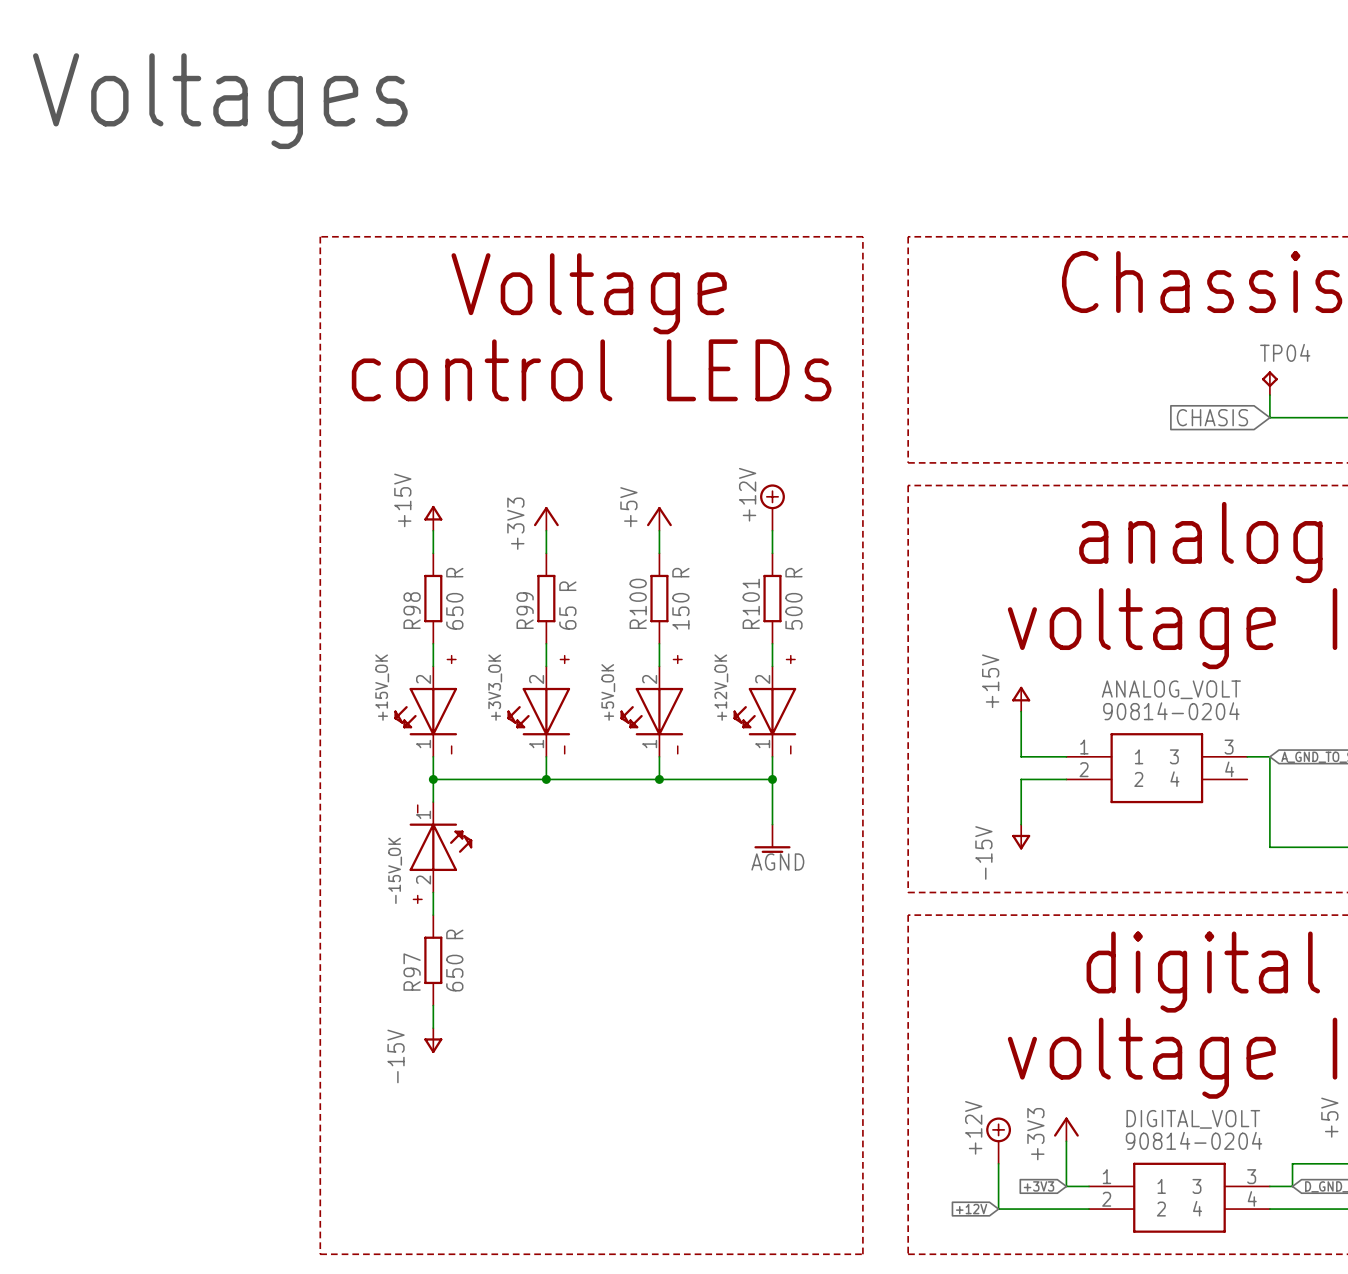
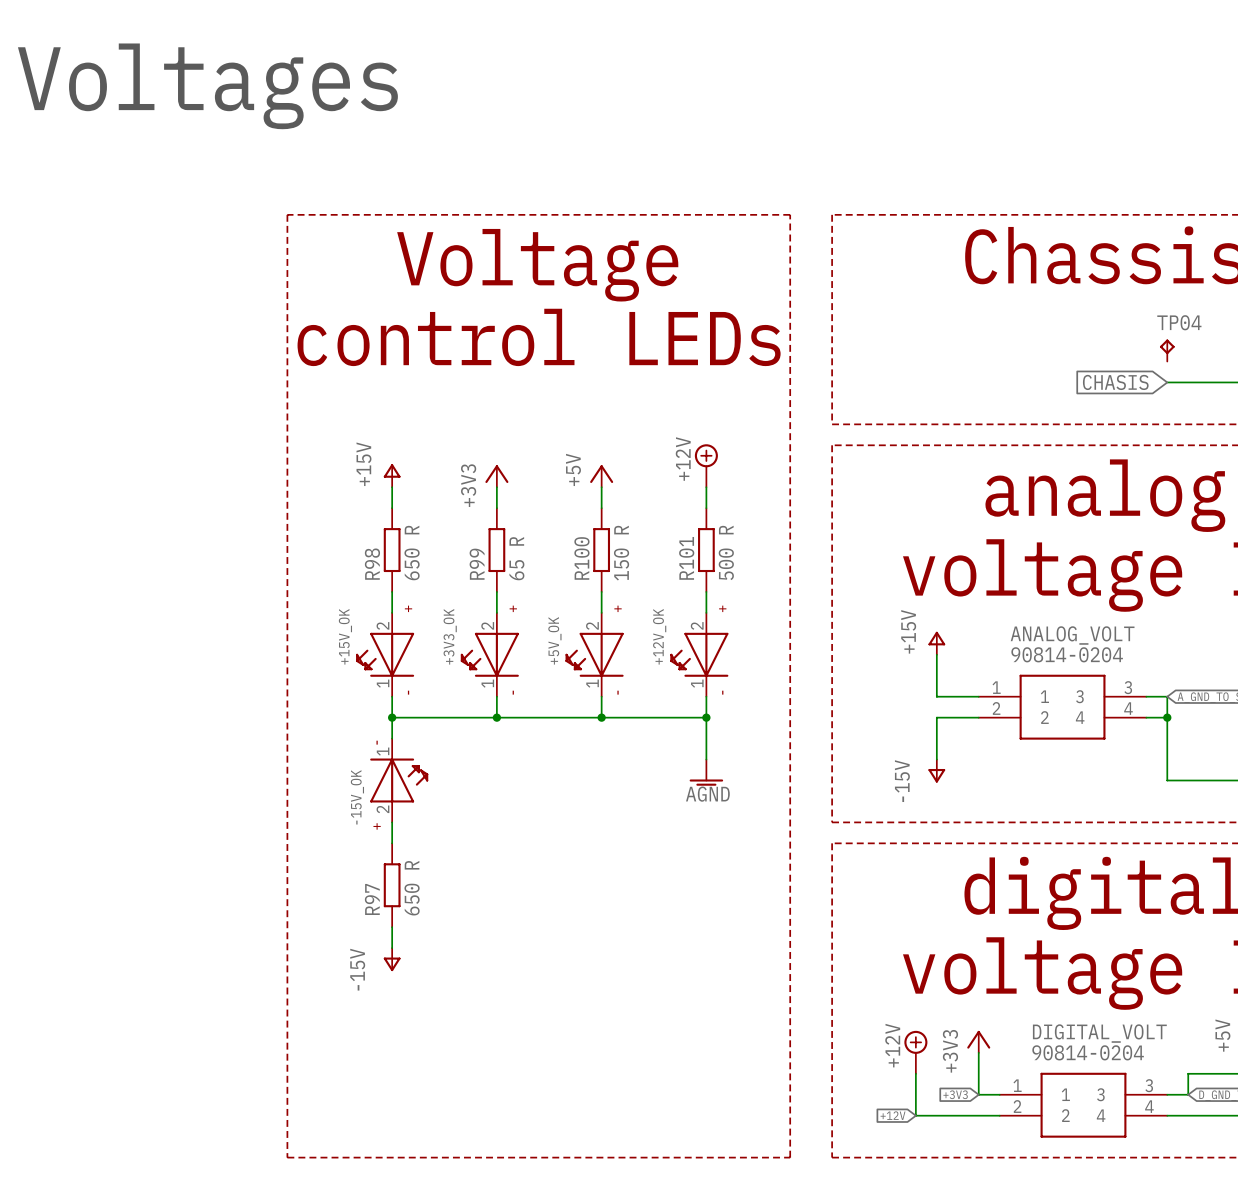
wire: (1269, 395) (1269, 417) -> none
wire: none -> (1146, 717) (1167, 717)
junction: none -> (1167, 717)

